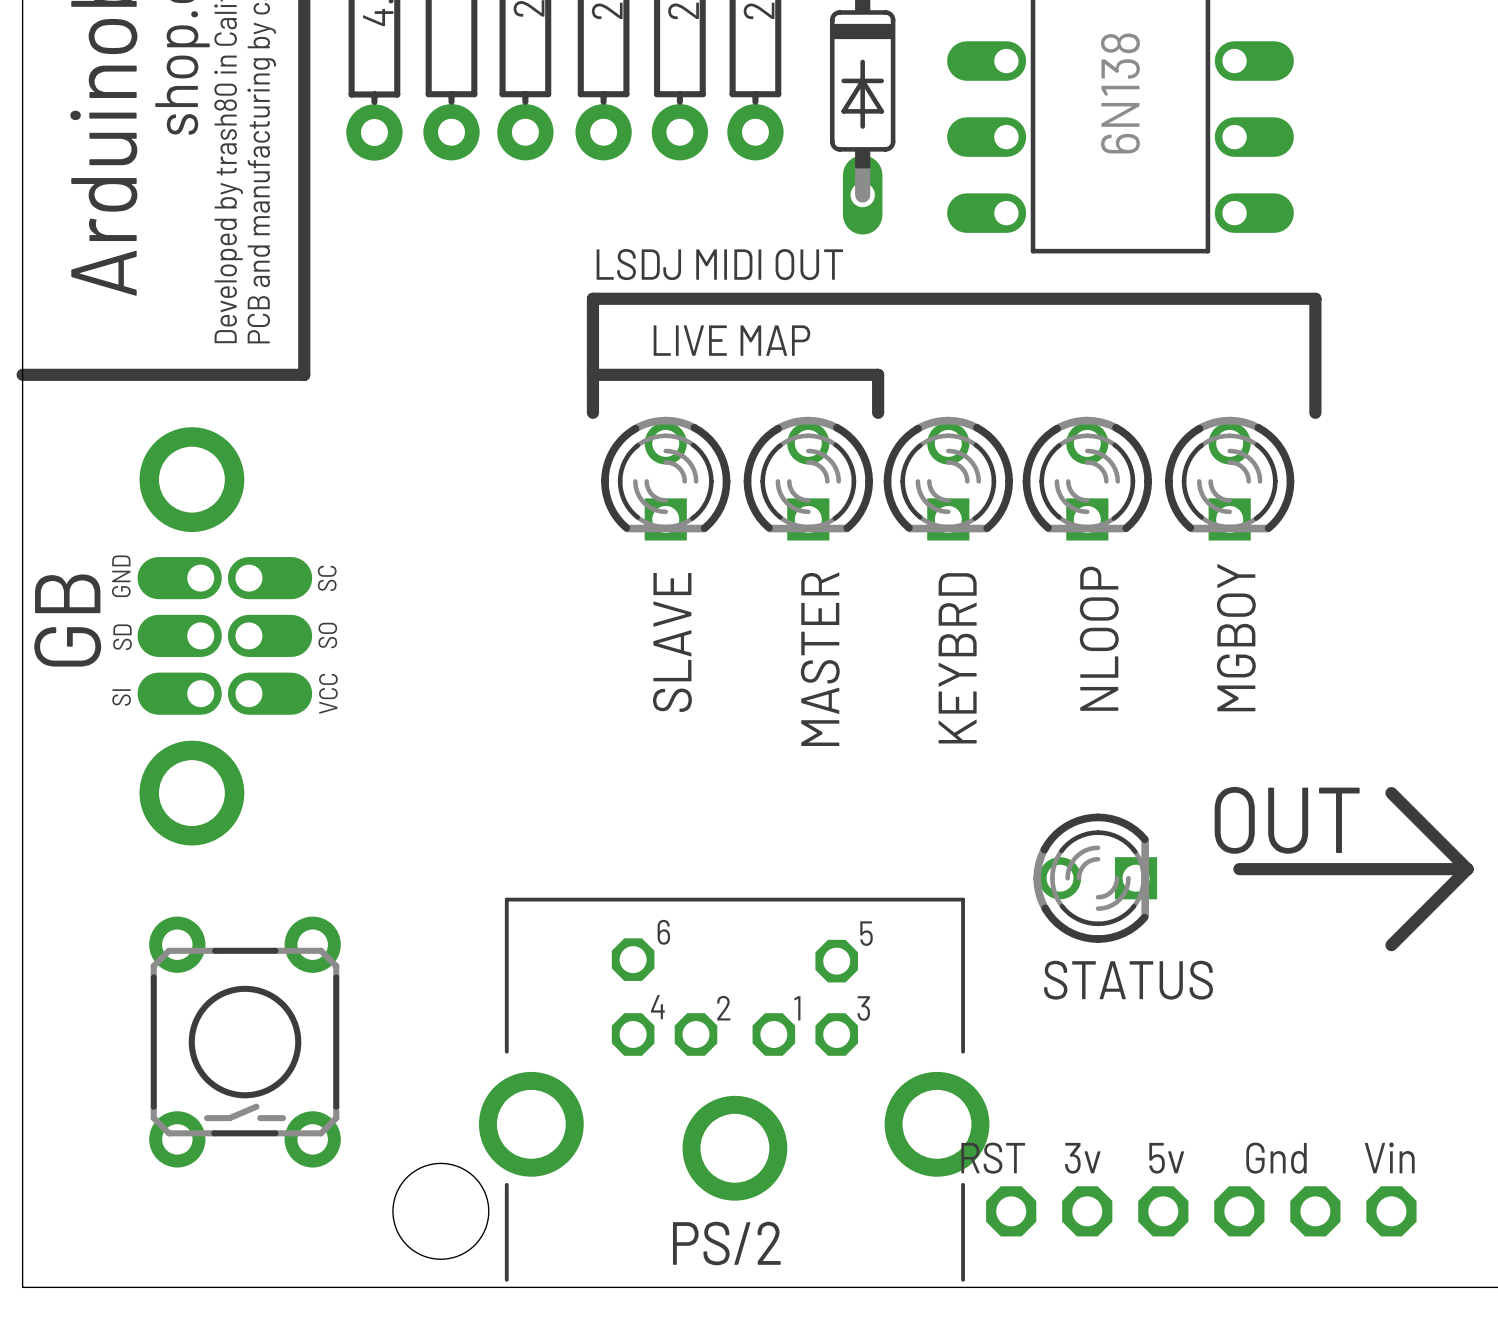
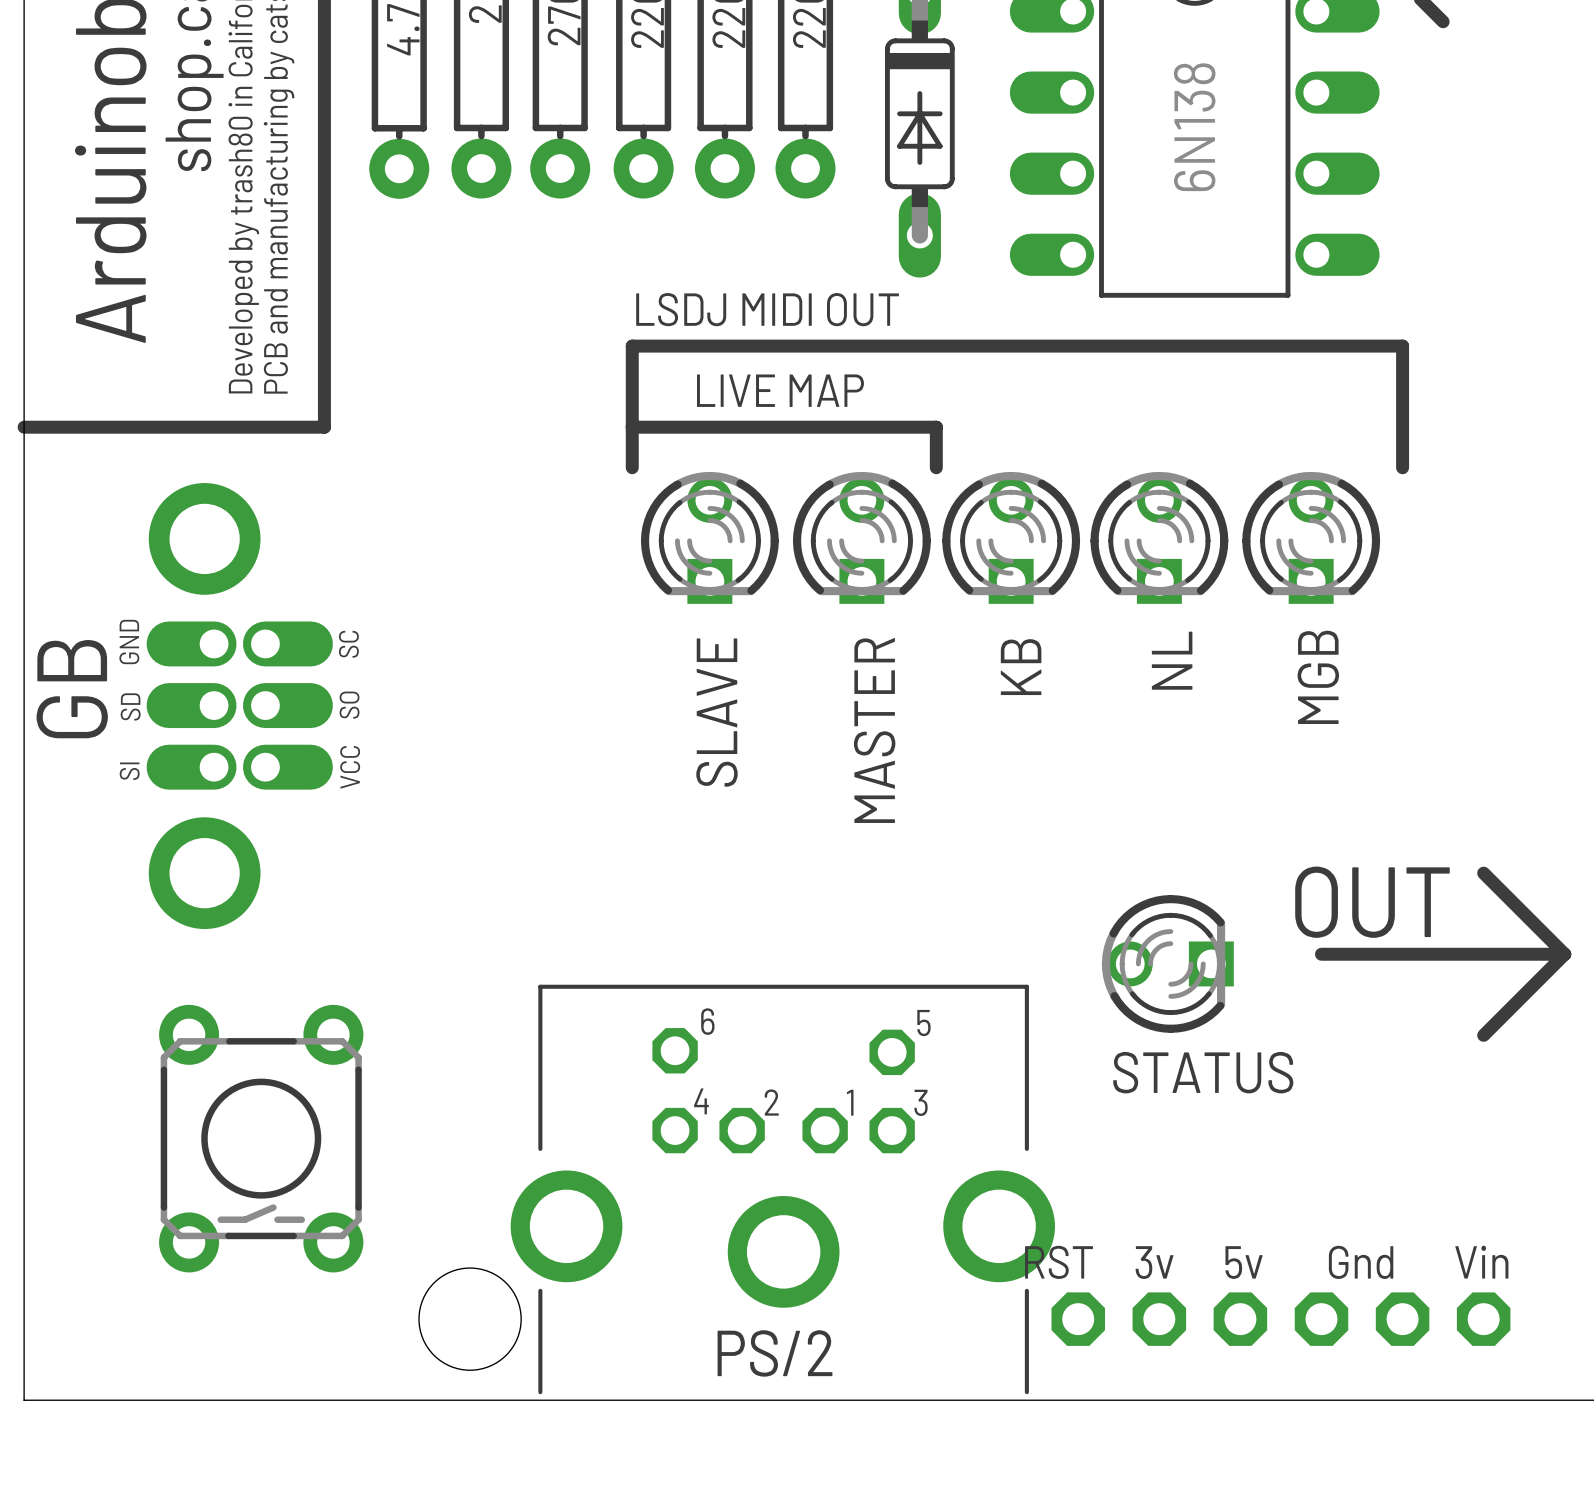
MGBOY name: MGBOY (1236, 637) -> MGB (1318, 677)
NLOOP name: NLOOP (1099, 638) -> NL (1172, 660)
KEYBRD name: KEYBRD (957, 658) -> KB (1021, 667)

